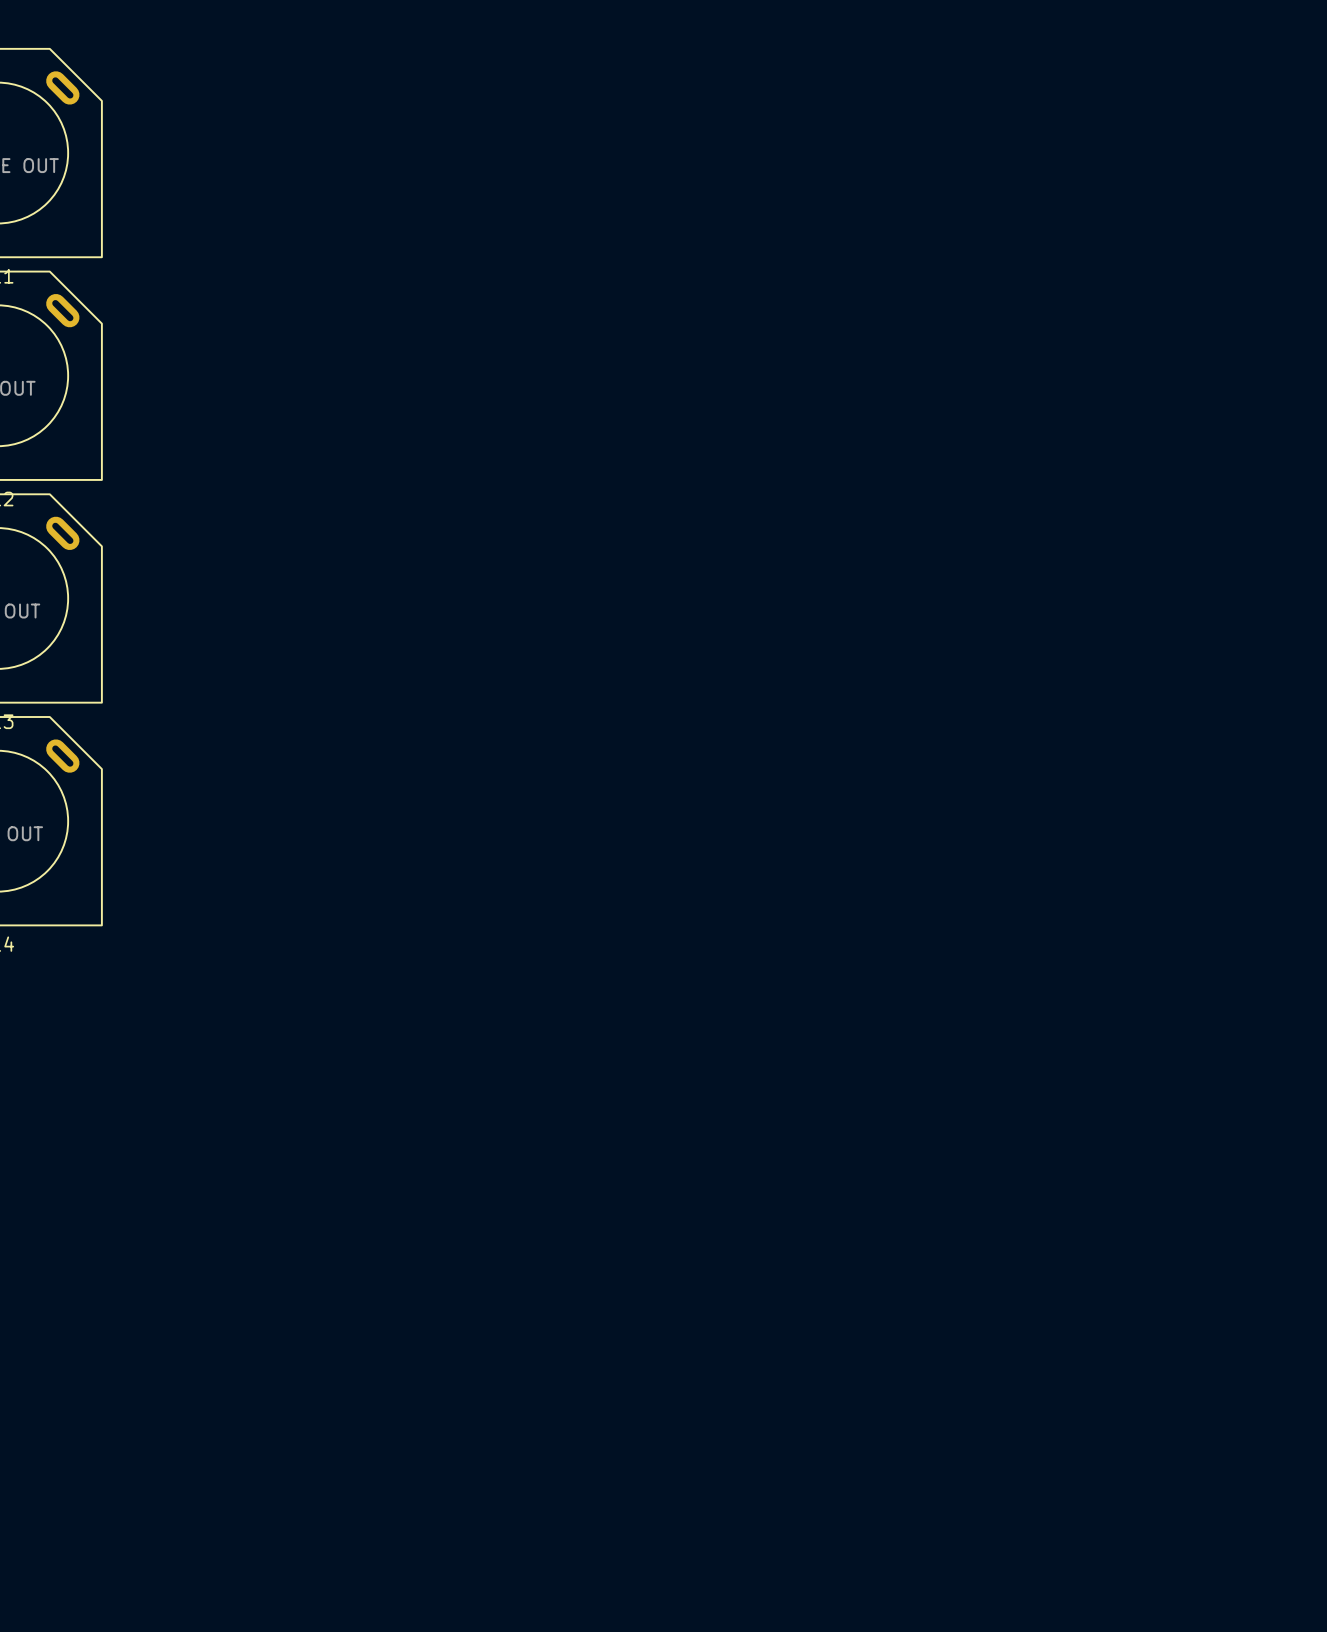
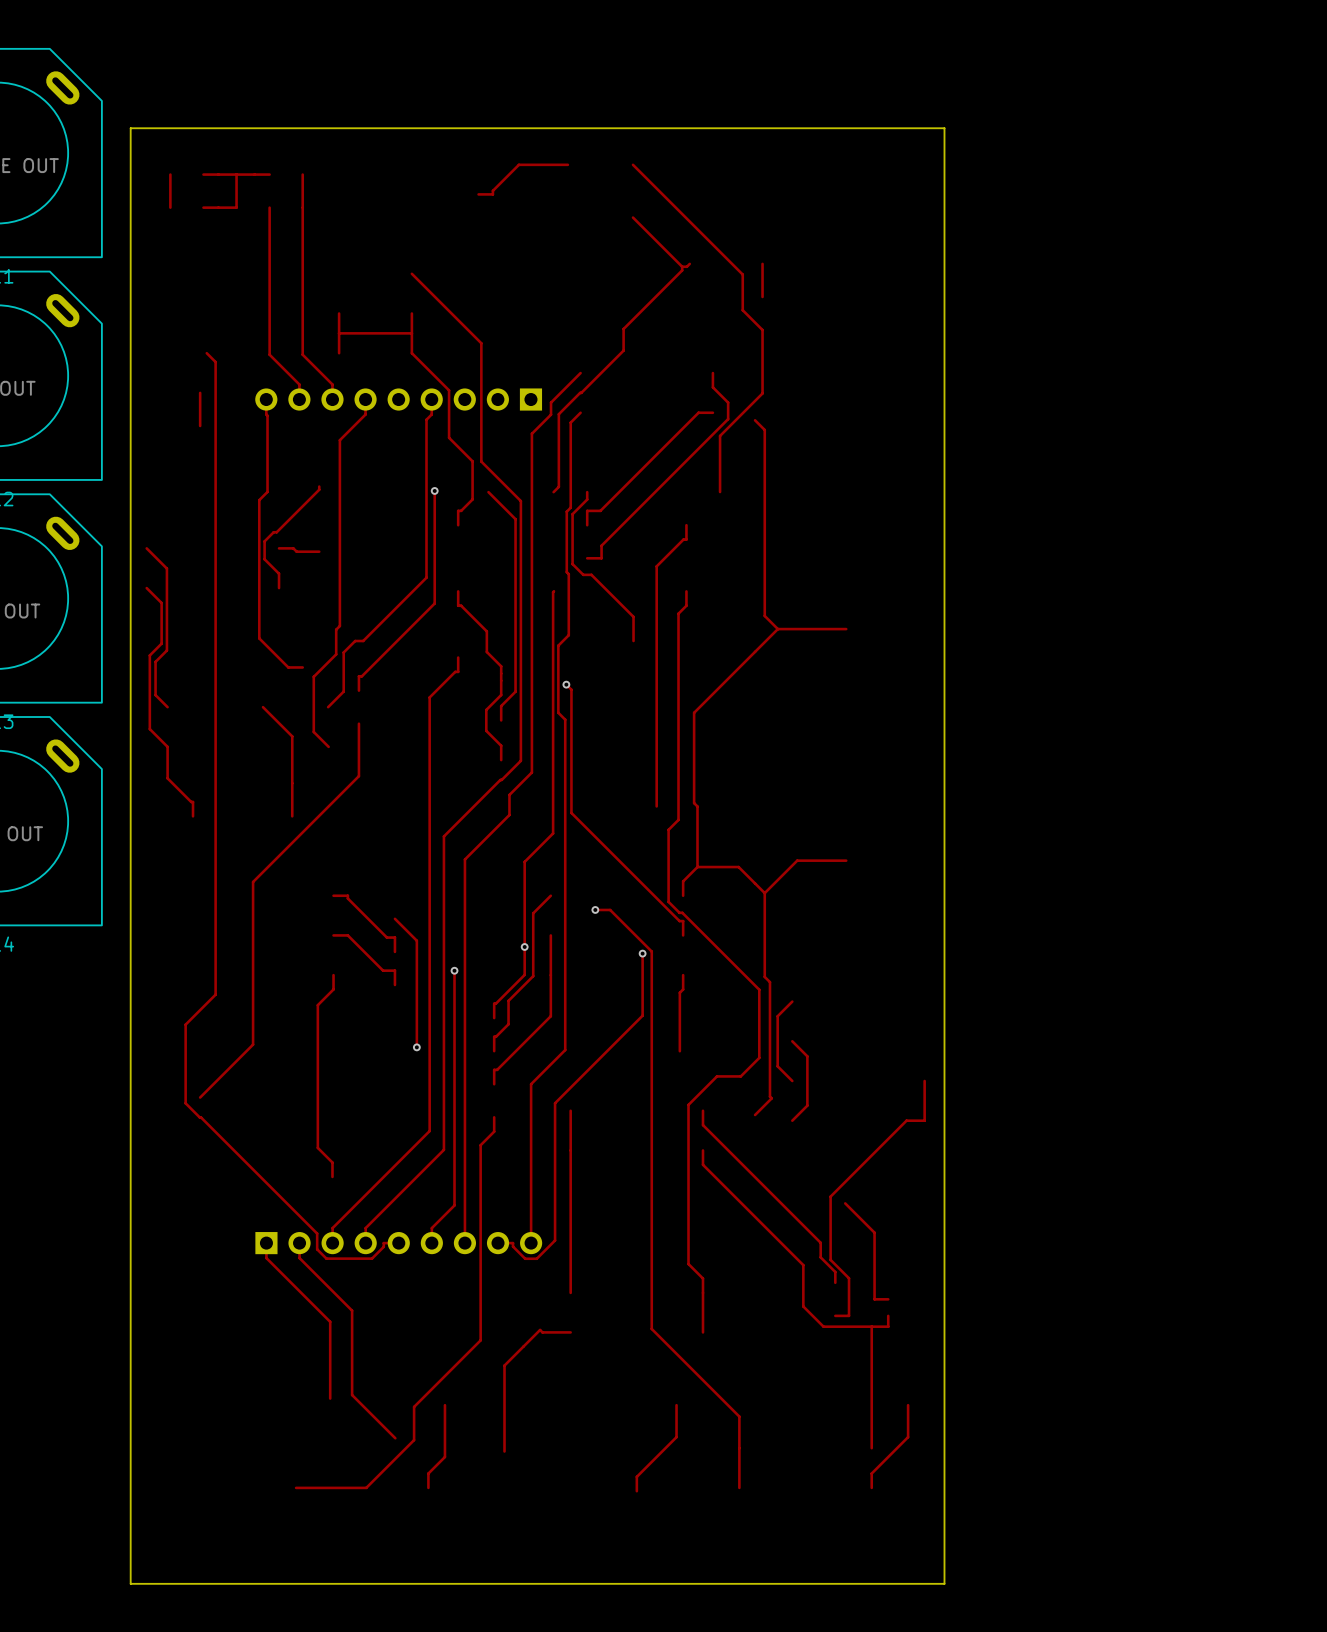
board edge: none -> (130, 128) (944, 128) (944, 1583) (130, 1583) (130, 128)
track: none -> (567, 164) (518, 164) (492, 190) (492, 194) (478, 194)
track: none -> (633, 164) (742, 274) (742, 310) (762, 330) (762, 393) (720, 435) (720, 492)
track: none -> (170, 174) (170, 207)
track: none -> (203, 174) (269, 174)
track: none -> (236, 174) (236, 207) (203, 207)
track: none -> (302, 174) (302, 354) (332, 384) (332, 399)
track: none -> (269, 207) (269, 354) (299, 384) (299, 399)
track: none -> (633, 217) (682, 266)
track: none -> (689, 263) (686, 266) (682, 266)
track: none -> (762, 263) (762, 296)
track: none -> (682, 266) (682, 270) (623, 329) (623, 350) (558, 414) (558, 486) (553, 492)
track: none -> (411, 273) (481, 343) (481, 461) (520, 501) (520, 760) (443, 836) (443, 1149) (365, 1228) (365, 1243)
track: none -> (339, 313) (339, 353)
track: none -> (411, 313) (411, 353) (449, 390) (449, 437) (472, 461) (472, 499) (461, 510) (458, 510) (458, 525)
track: none -> (339, 333) (411, 333)
track: none -> (206, 353) (215, 362) (215, 994) (185, 1024) (185, 1103) (317, 1233) (317, 1249) (326, 1258) (371, 1258) (383, 1246) (383, 1243) (398, 1243)
track: none -> (580, 373) (551, 402) (551, 414) (531, 433) (531, 772) (509, 794) (509, 814) (464, 859) (464, 1243)
track: none -> (712, 373) (712, 387) (728, 402) (728, 419) (601, 545) (601, 558) (587, 558)
track: none -> (200, 392) (200, 425)
track: none -> (266, 399) (267, 491) (259, 500) (259, 638) (288, 667) (302, 667)
track: none -> (365, 399) (365, 414) (339, 440) (339, 626) (336, 629) (336, 654) (313, 676) (313, 732) (328, 746)
part: none -> (398, 399)
track: none -> (431, 399) (431, 414) (426, 419) (426, 577) (363, 641) (355, 641) (343, 652) (343, 691) (328, 707)
track: none -> (580, 412) (570, 422) (570, 507) (566, 511) (568, 635) (558, 645) (558, 712) (565, 719) (565, 1050) (531, 1084) (531, 1243)
track: none -> (712, 412) (698, 412) (600, 510) (587, 510) (587, 525)
track: none -> (755, 420) (764, 429) (764, 615) (777, 629)
track: none -> (319, 486) (319, 489) (276, 532) (273, 532) (264, 541) (264, 559) (279, 573) (279, 588)
track: none -> (434, 490) (434, 603) (361, 676) (358, 676) (358, 690)
via: none -> (434, 490)
track: none -> (488, 492) (515, 519) (515, 691) (501, 706) (501, 720)
track: none -> (587, 492) (587, 499) (572, 514) (572, 564) (583, 574) (591, 574) (633, 616) (633, 641)
track: none -> (686, 525) (686, 539) (683, 539) (656, 566) (656, 806)
track: none -> (146, 548) (166, 568) (166, 650) (155, 661) (155, 695) (167, 707)
track: none -> (279, 548) (293, 548) (296, 551) (319, 551)
track: none -> (146, 588) (161, 603) (161, 643) (149, 655) (149, 729) (167, 746) (167, 778) (193, 802) (193, 816)
track: none -> (458, 591) (458, 605) (461, 605) (486, 631) (486, 652) (501, 666) (501, 695) (486, 709) (486, 730) (501, 745) (501, 760)
track: none -> (554, 591) (553, 833) (524, 861) (524, 974) (494, 1003) (494, 1018)
track: none -> (686, 591) (686, 605) (678, 613) (678, 819) (668, 829) (668, 901) (679, 912) (682, 912) (759, 989) (759, 1057) (740, 1076) (716, 1076) (688, 1104) (688, 1264) (702, 1278) (702, 1332)
track: none -> (777, 629) (694, 712) (694, 803) (697, 806) (697, 867)
track: none -> (777, 629) (846, 629)
track: none -> (458, 657) (458, 671) (455, 671) (429, 697) (429, 1131) (332, 1228) (332, 1243)
track: none -> (566, 684) (571, 689) (571, 812) (679, 921) (683, 921) (683, 935)
via: none -> (566, 684)
track: none -> (263, 707) (292, 736) (292, 816)
track: none -> (358, 723) (358, 776) (253, 882) (253, 1044) (200, 1097)
track: none -> (846, 860) (797, 860) (764, 893)
track: none -> (697, 867) (738, 867) (764, 893)
track: none -> (697, 867) (683, 881) (683, 895)
track: none -> (764, 893) (764, 976) (769, 982) (769, 1096) (771, 1098) (755, 1115)
track: none -> (333, 895) (347, 895) (347, 898) (386, 937) (394, 937) (394, 951)
track: none -> (550, 895) (533, 913) (533, 976) (508, 1000) (508, 1024) (494, 1036) (494, 1051)
track: none -> (595, 909) (610, 909) (651, 951) (651, 1328) (739, 1416) (739, 1487)
via: none -> (595, 909)
track: none -> (394, 918) (416, 940) (416, 1047)
track: none -> (333, 935) (347, 935) (383, 970) (394, 970) (394, 985)
track: none -> (550, 935) (550, 1016) (497, 1069) (494, 1069) (494, 1084)
via: none -> (524, 946)
track: none -> (642, 953) (642, 1015) (555, 1103) (555, 1240) (536, 1258) (525, 1258) (513, 1246) (513, 1243) (498, 1243)
via: none -> (642, 953)
track: none -> (454, 970) (454, 1205) (431, 1228) (431, 1243)
via: none -> (454, 970)
track: none -> (333, 975) (333, 989) (317, 1005) (317, 1147) (332, 1162) (332, 1176)
track: none -> (683, 975) (683, 989) (679, 992) (679, 1051)
track: none -> (792, 1001) (777, 1016) (777, 1066) (792, 1081)
track: none -> (792, 1041) (807, 1056) (807, 1105) (792, 1120)
via: none -> (416, 1047)
track: none -> (924, 1081) (924, 1120) (906, 1120) (830, 1196) (830, 1259) (849, 1278) (849, 1315) (835, 1315)
track: none -> (570, 1110) (570, 1292)
track: none -> (702, 1110) (702, 1125) (820, 1242) (820, 1257) (835, 1272) (835, 1282)
track: none -> (494, 1117) (494, 1131) (480, 1145) (480, 1340) (414, 1406) (414, 1440) (366, 1487) (296, 1487)
track: none -> (702, 1150) (702, 1164) (803, 1265) (803, 1306) (823, 1326) (888, 1326)
track: none -> (845, 1203) (874, 1232) (874, 1299) (888, 1299)
track: none -> (266, 1243) (266, 1258) (330, 1321) (330, 1398)
track: none -> (299, 1243) (299, 1258) (352, 1310) (352, 1395) (395, 1438)
part: none -> (398, 1243)
track: none -> (888, 1315) (888, 1326)
track: none -> (871, 1326) (871, 1448)
track: none -> (570, 1332) (542, 1332) (540, 1329) (504, 1365) (504, 1451)
track: none -> (444, 1405) (444, 1457) (428, 1473) (428, 1487)
track: none -> (676, 1405) (676, 1437) (636, 1476) (636, 1491)
track: none -> (908, 1405) (908, 1437) (871, 1473) (871, 1487)

